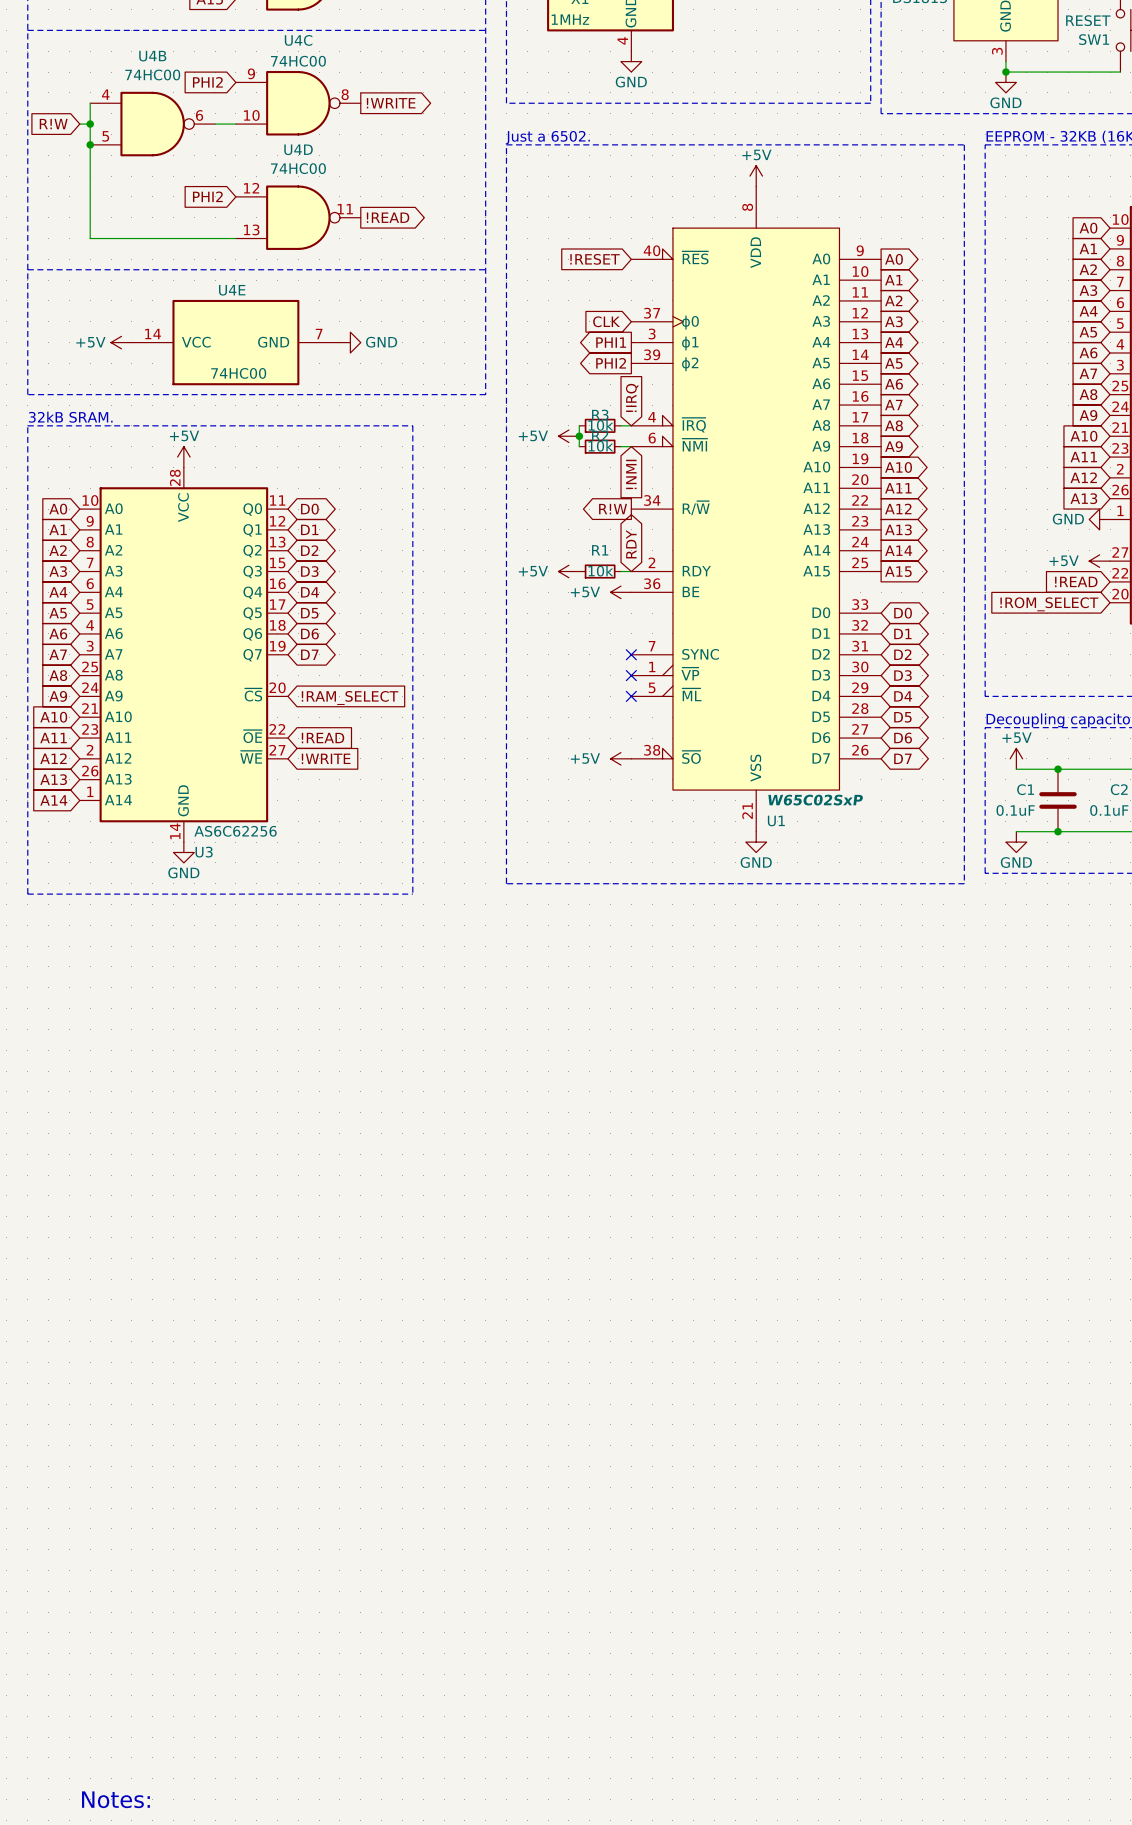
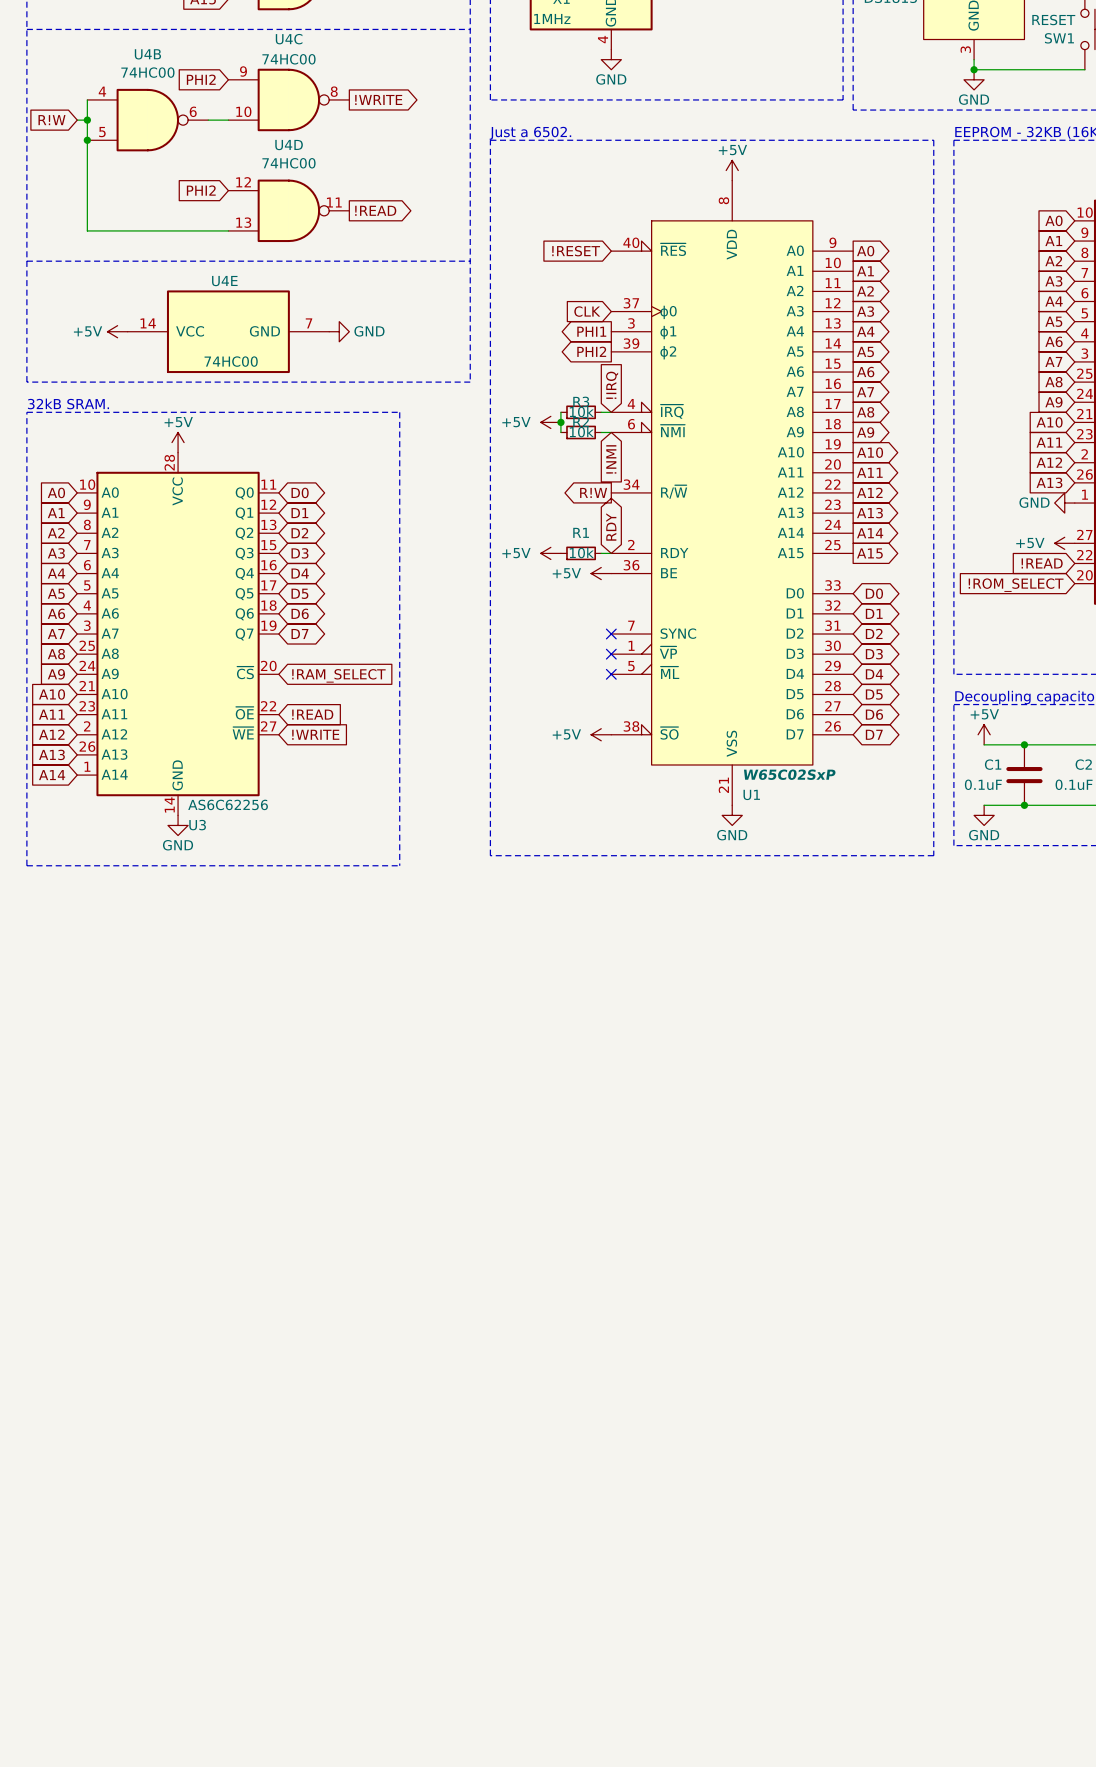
text: Notes: (115, 1799) -> none

